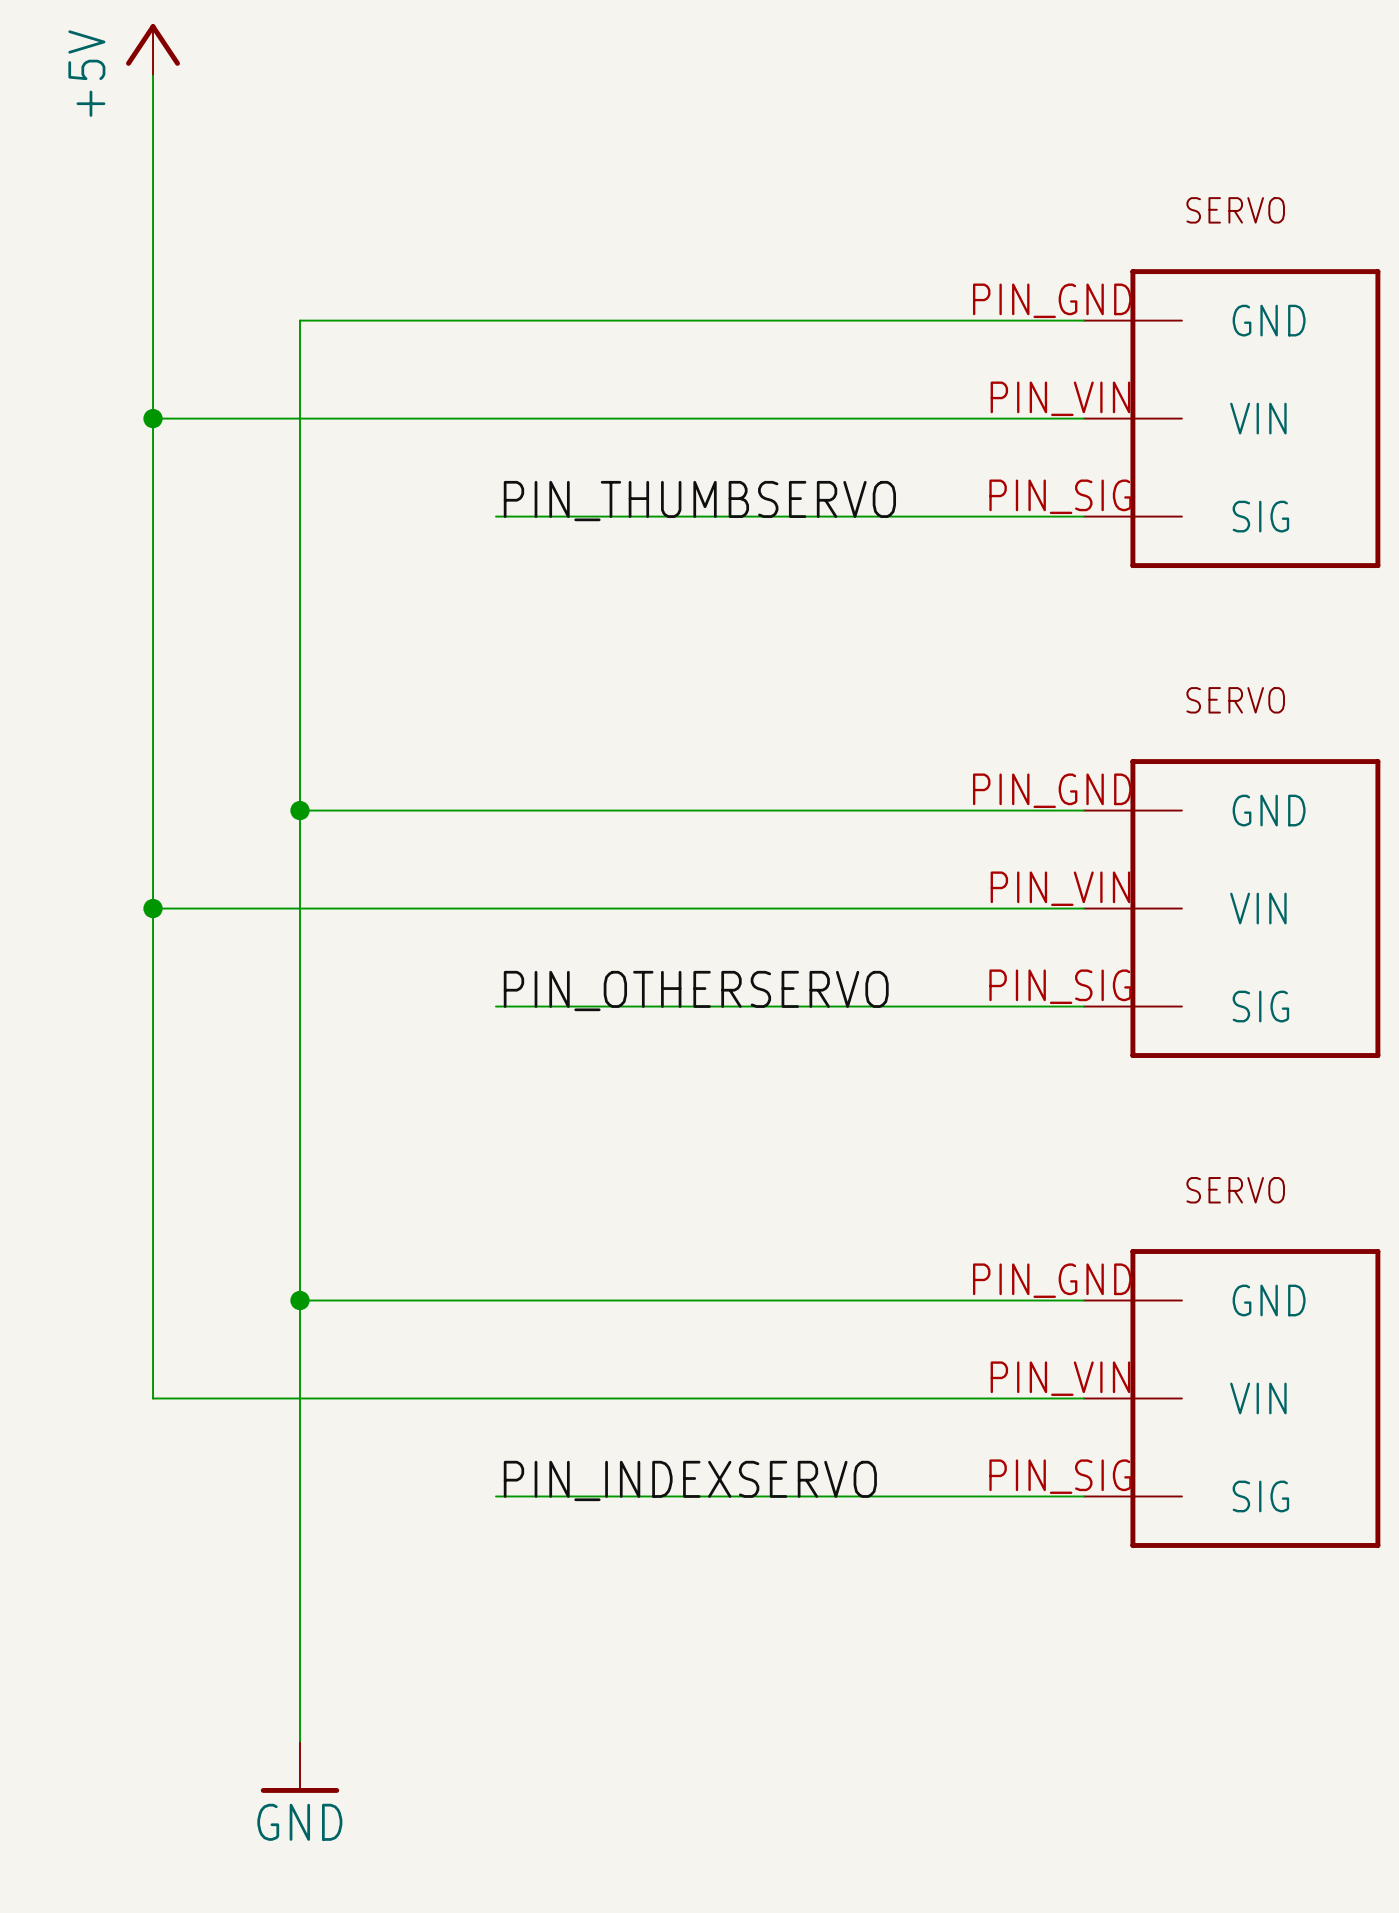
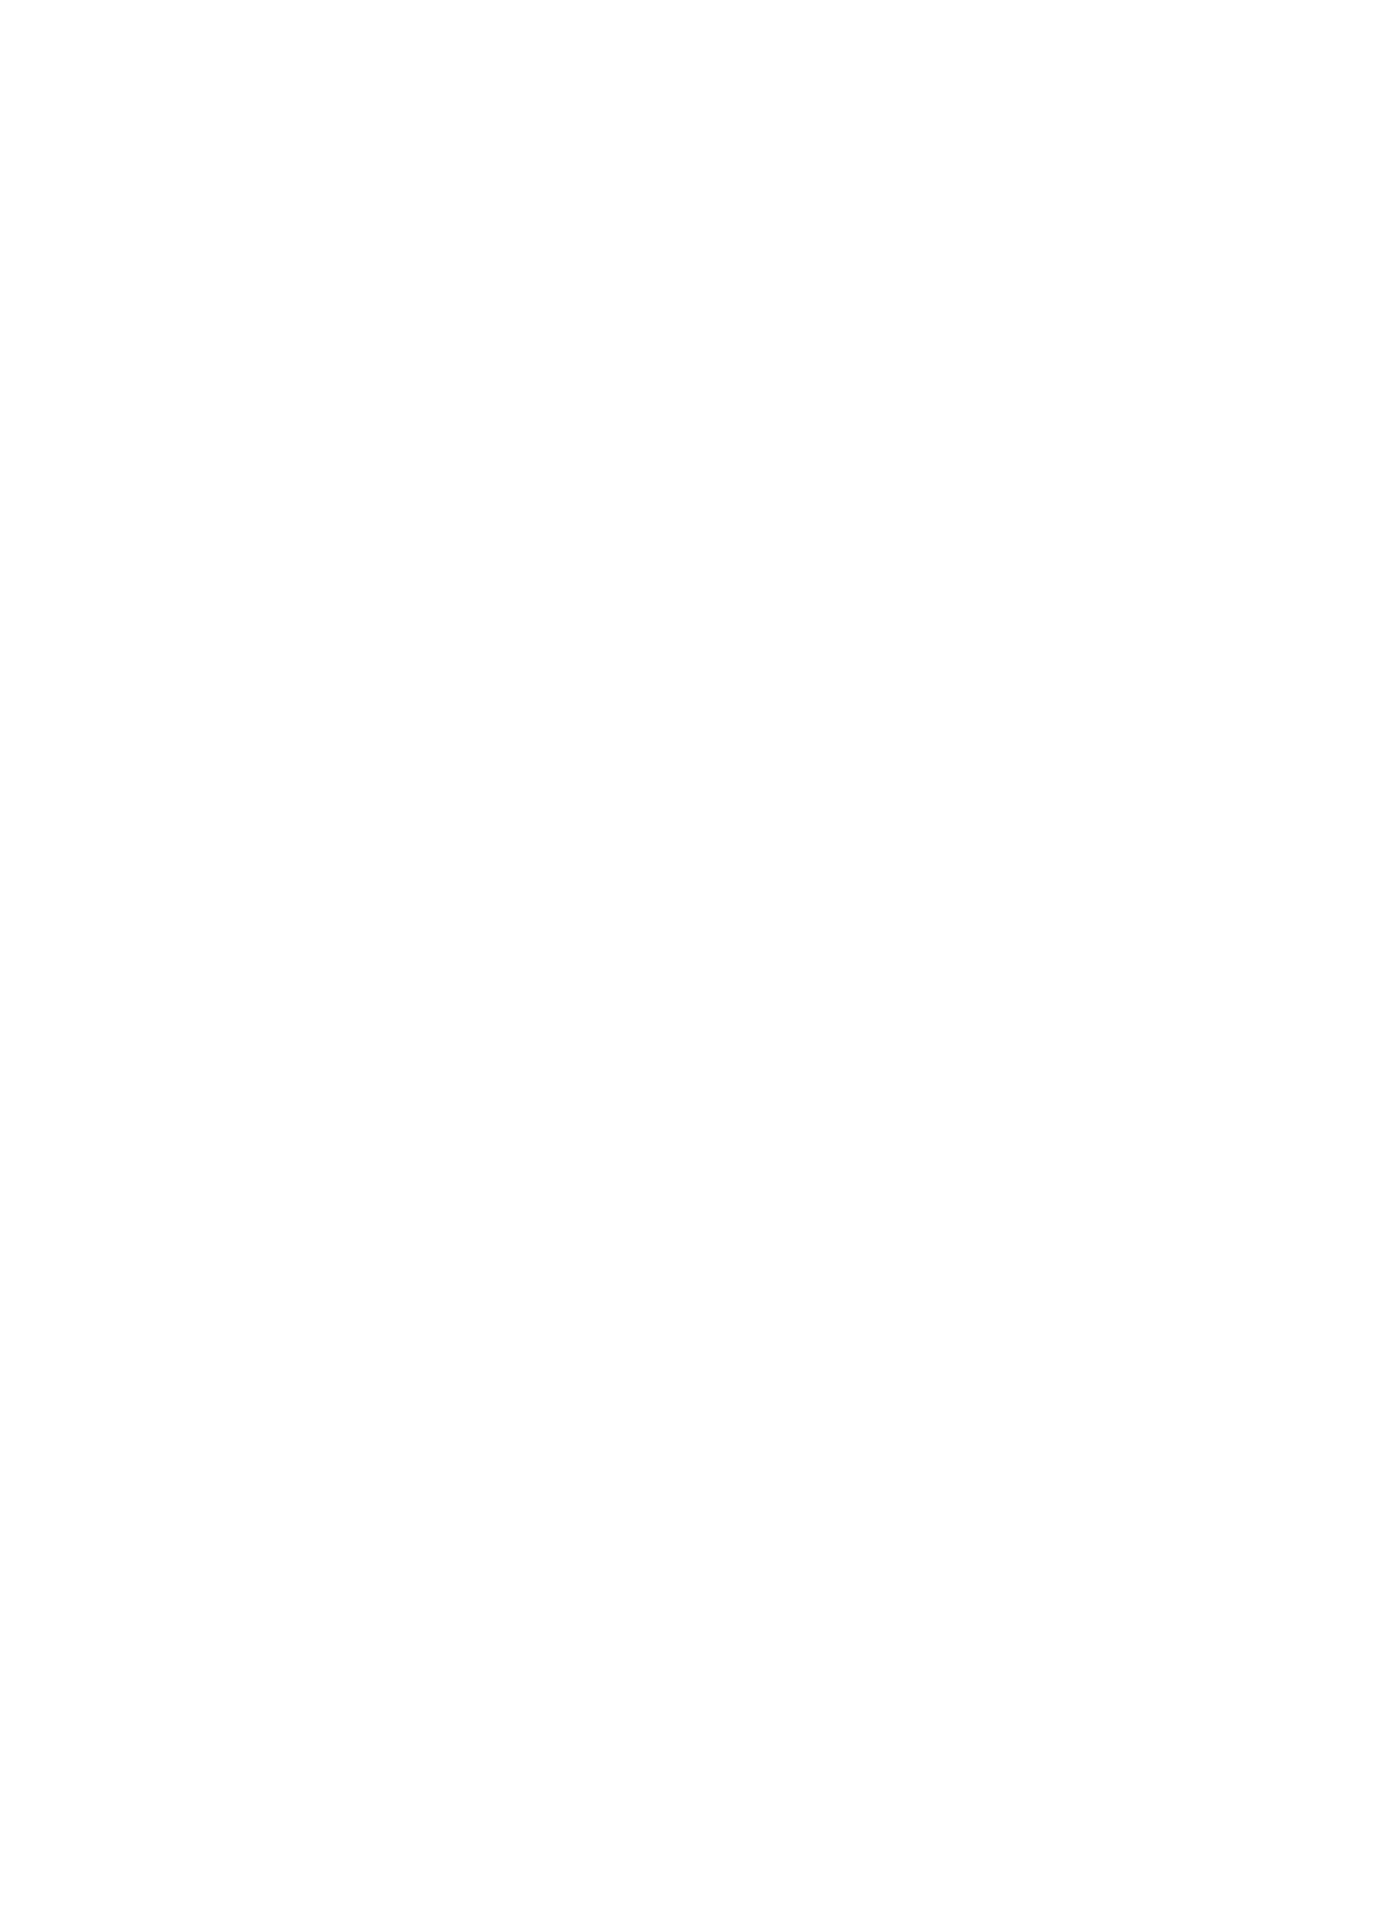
power symbol: +5V (153, 49) -> none
wire: (153, 75) (153, 1398) (1083, 1398) -> none
wire: (1083, 320) (300, 320) (300, 1741) -> none
wire: (153, 418) (1083, 418) -> none
junction: (153, 418) -> none
part: (1232, 418) -> none
label: PIN_THUMBSERVO (699, 501) -> none
wire: (495, 516) (1083, 516) -> none
wire: (300, 810) (1083, 810) -> none
junction: (300, 810) -> none
wire: (153, 908) (1083, 908) -> none
junction: (153, 908) -> none
part: (1232, 908) -> none
label: PIN_OTHERSERVO (696, 991) -> none
wire: (495, 1006) (1083, 1006) -> none
wire: (300, 1300) (1083, 1300) -> none
junction: (300, 1300) -> none
part: (1232, 1398) -> none
label: PIN_INDEXSERVO (690, 1480) -> none
wire: (495, 1496) (1083, 1496) -> none
power symbol: GND (300, 1767) -> none

